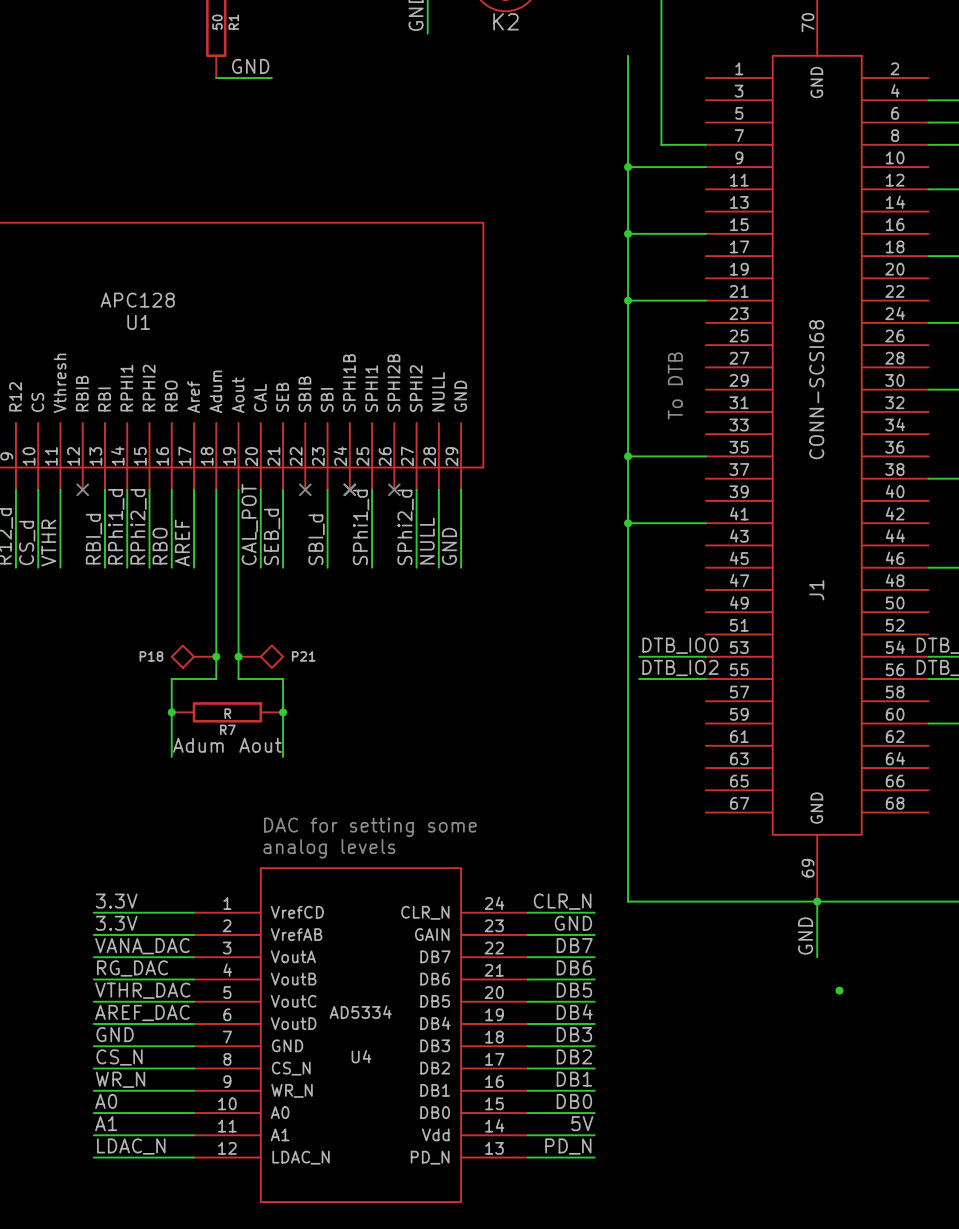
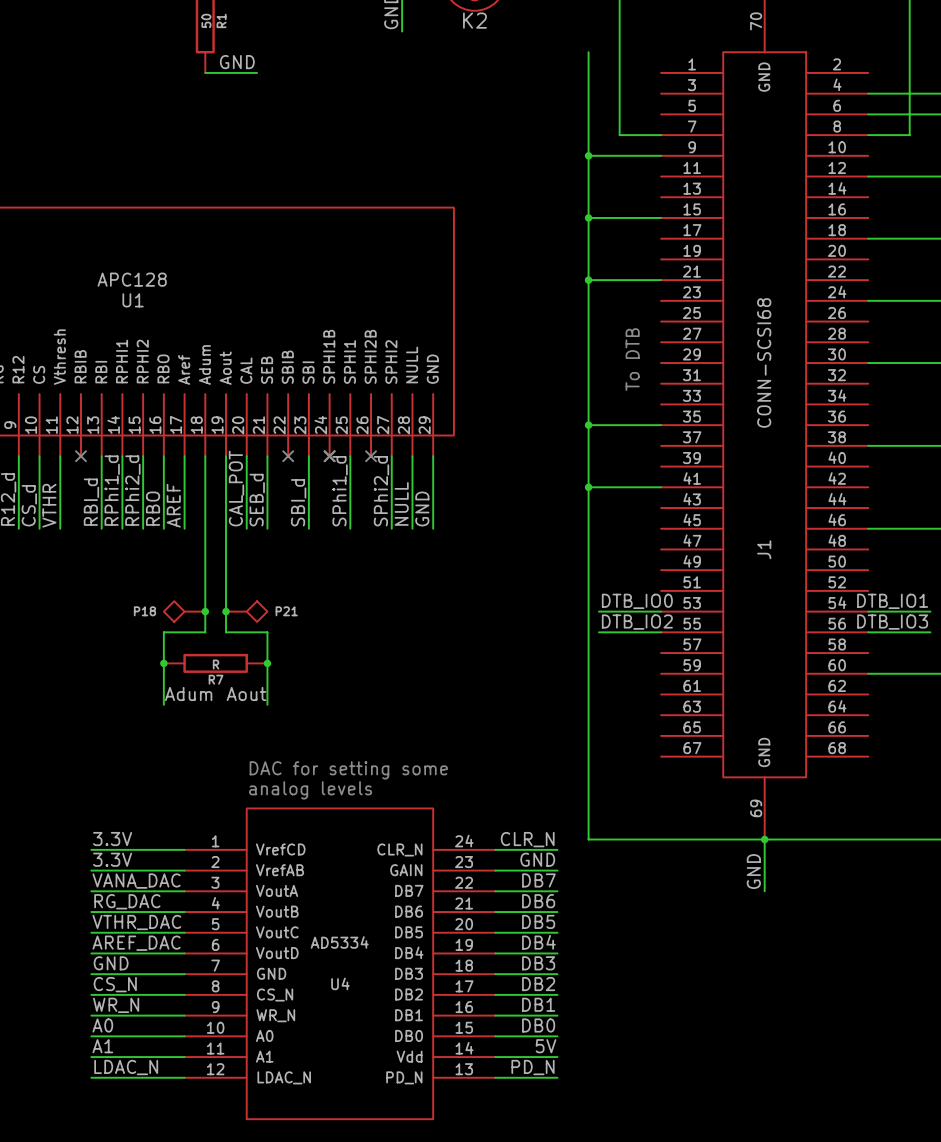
junction: (839, 990) -> none

